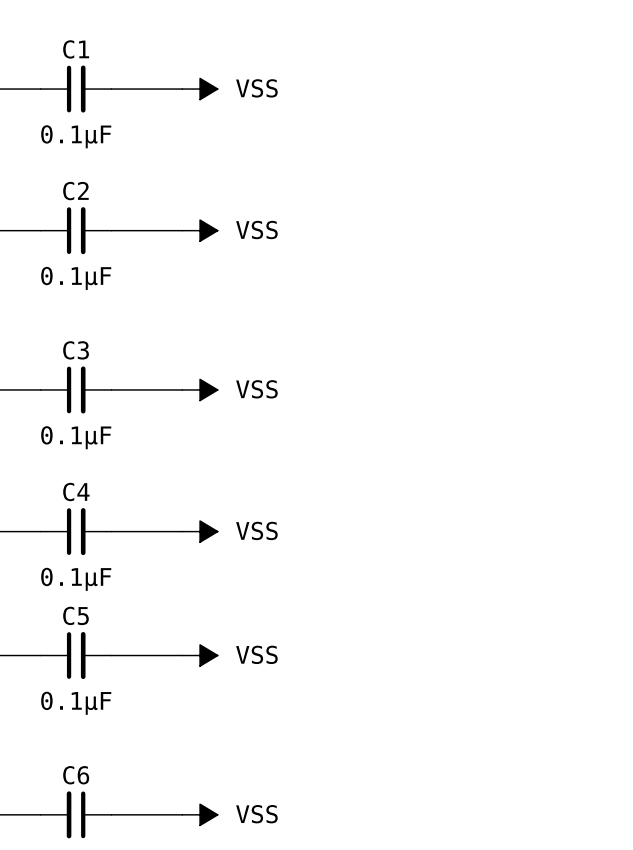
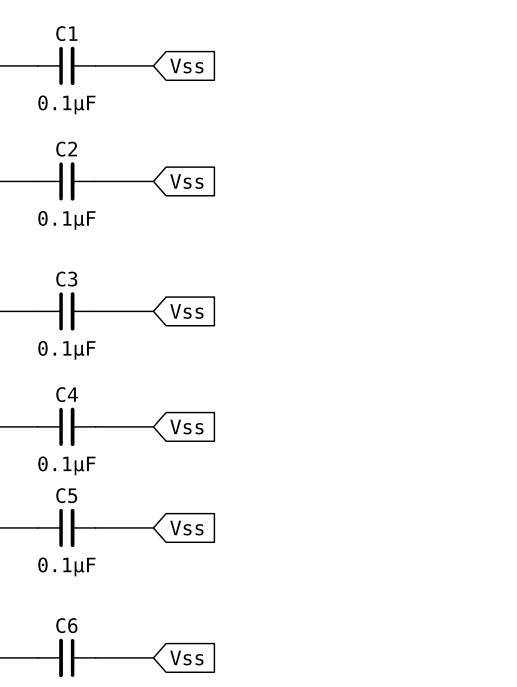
power symbol: VSS (200, 89) -> none
global label: none -> Vss (186, 66)
power symbol: VSS (200, 230) -> none
global label: none -> Vss (186, 181)
power symbol: VSS (200, 389) -> none
global label: none -> Vss (186, 311)
power symbol: VSS (200, 531) -> none
global label: none -> Vss (186, 427)
power symbol: VSS (200, 655) -> none
global label: none -> Vss (186, 528)
power symbol: VSS (200, 814) -> none
global label: none -> Vss (186, 658)

